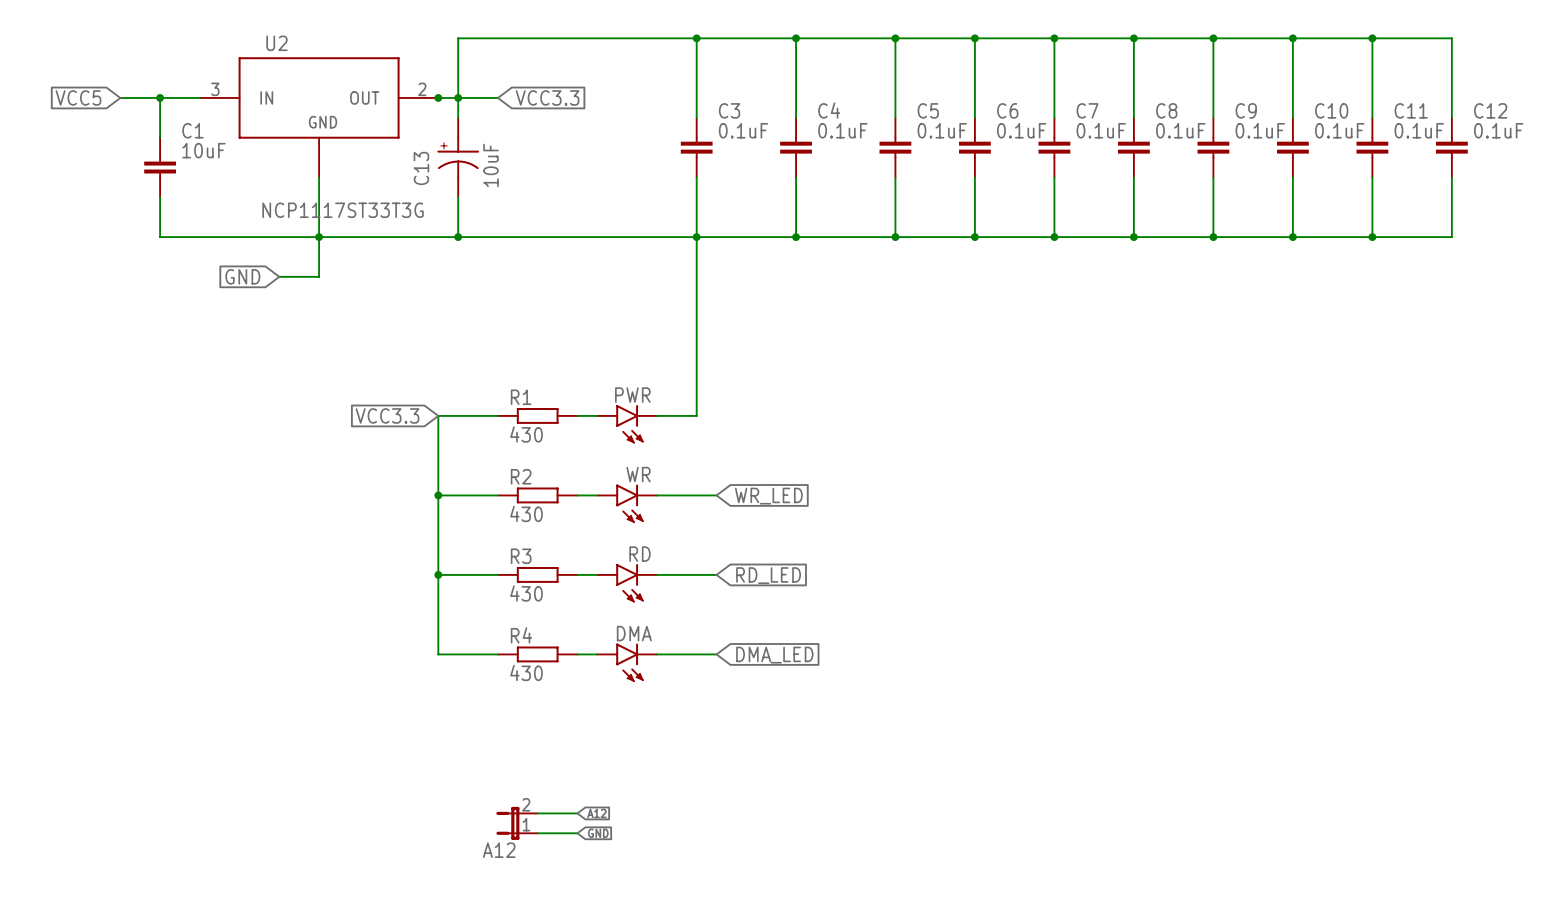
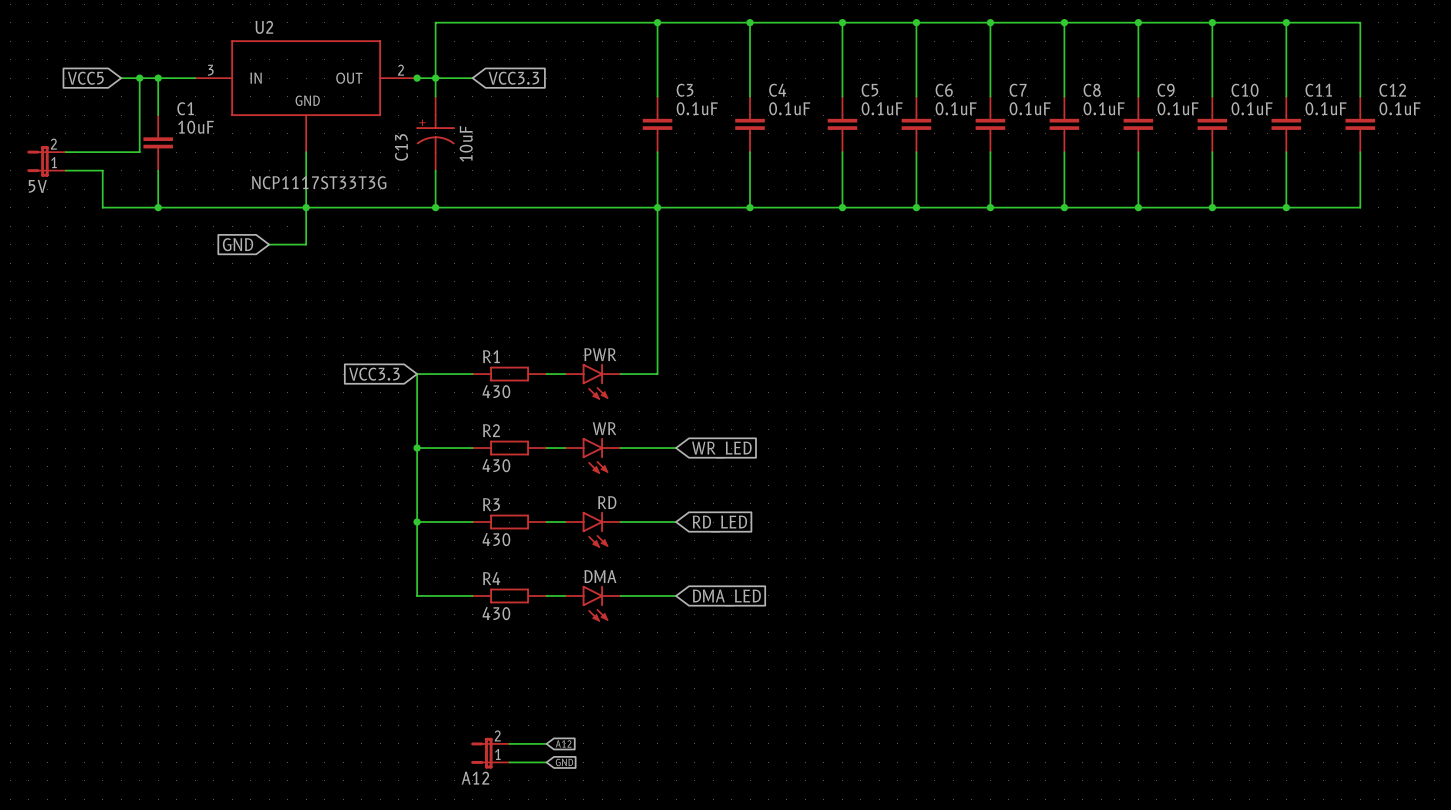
wire: none -> (139, 78) (139, 152) (65, 152)
junction: none -> (139, 78)
5V: none -> (46, 161)
wire: none -> (65, 170) (102, 170) (102, 207) (158, 207)
junction: none -> (158, 207)

